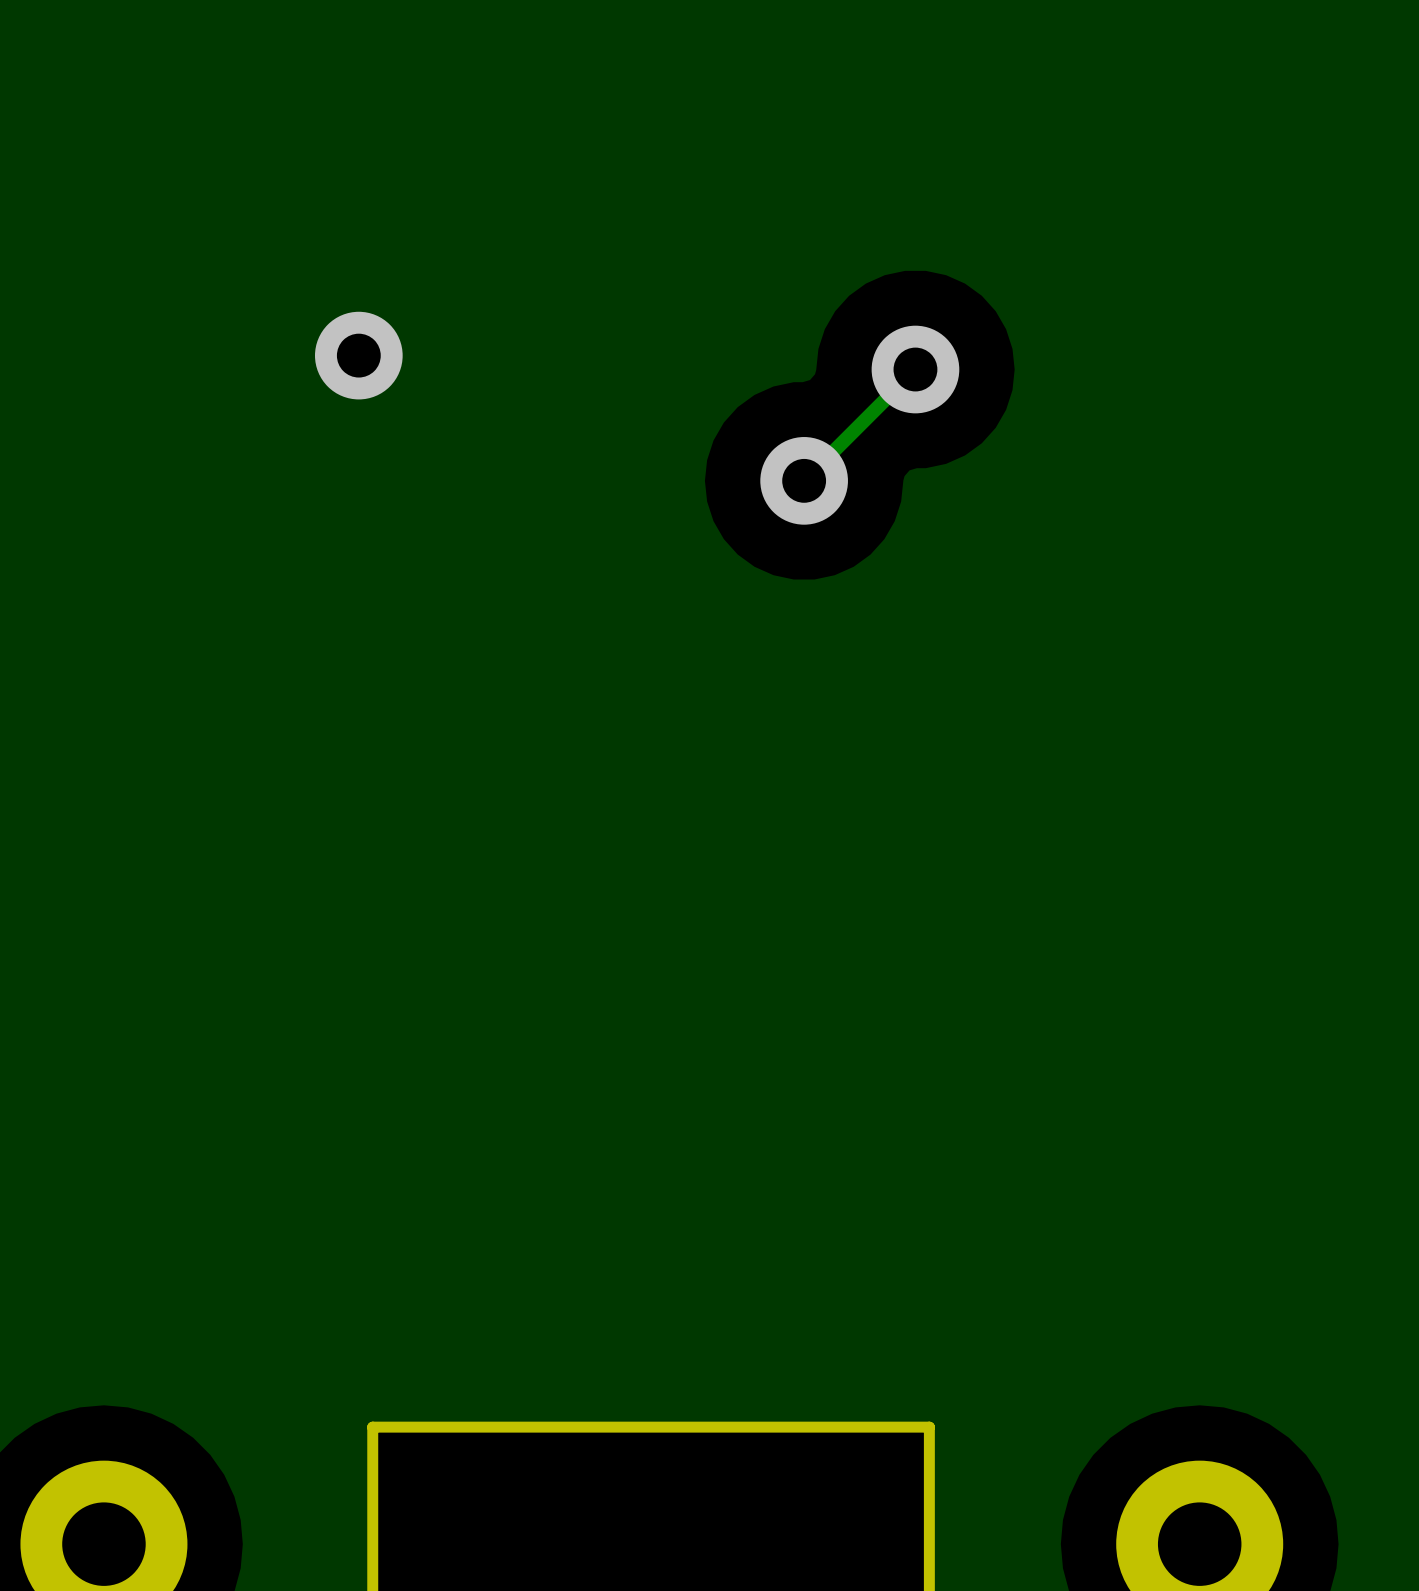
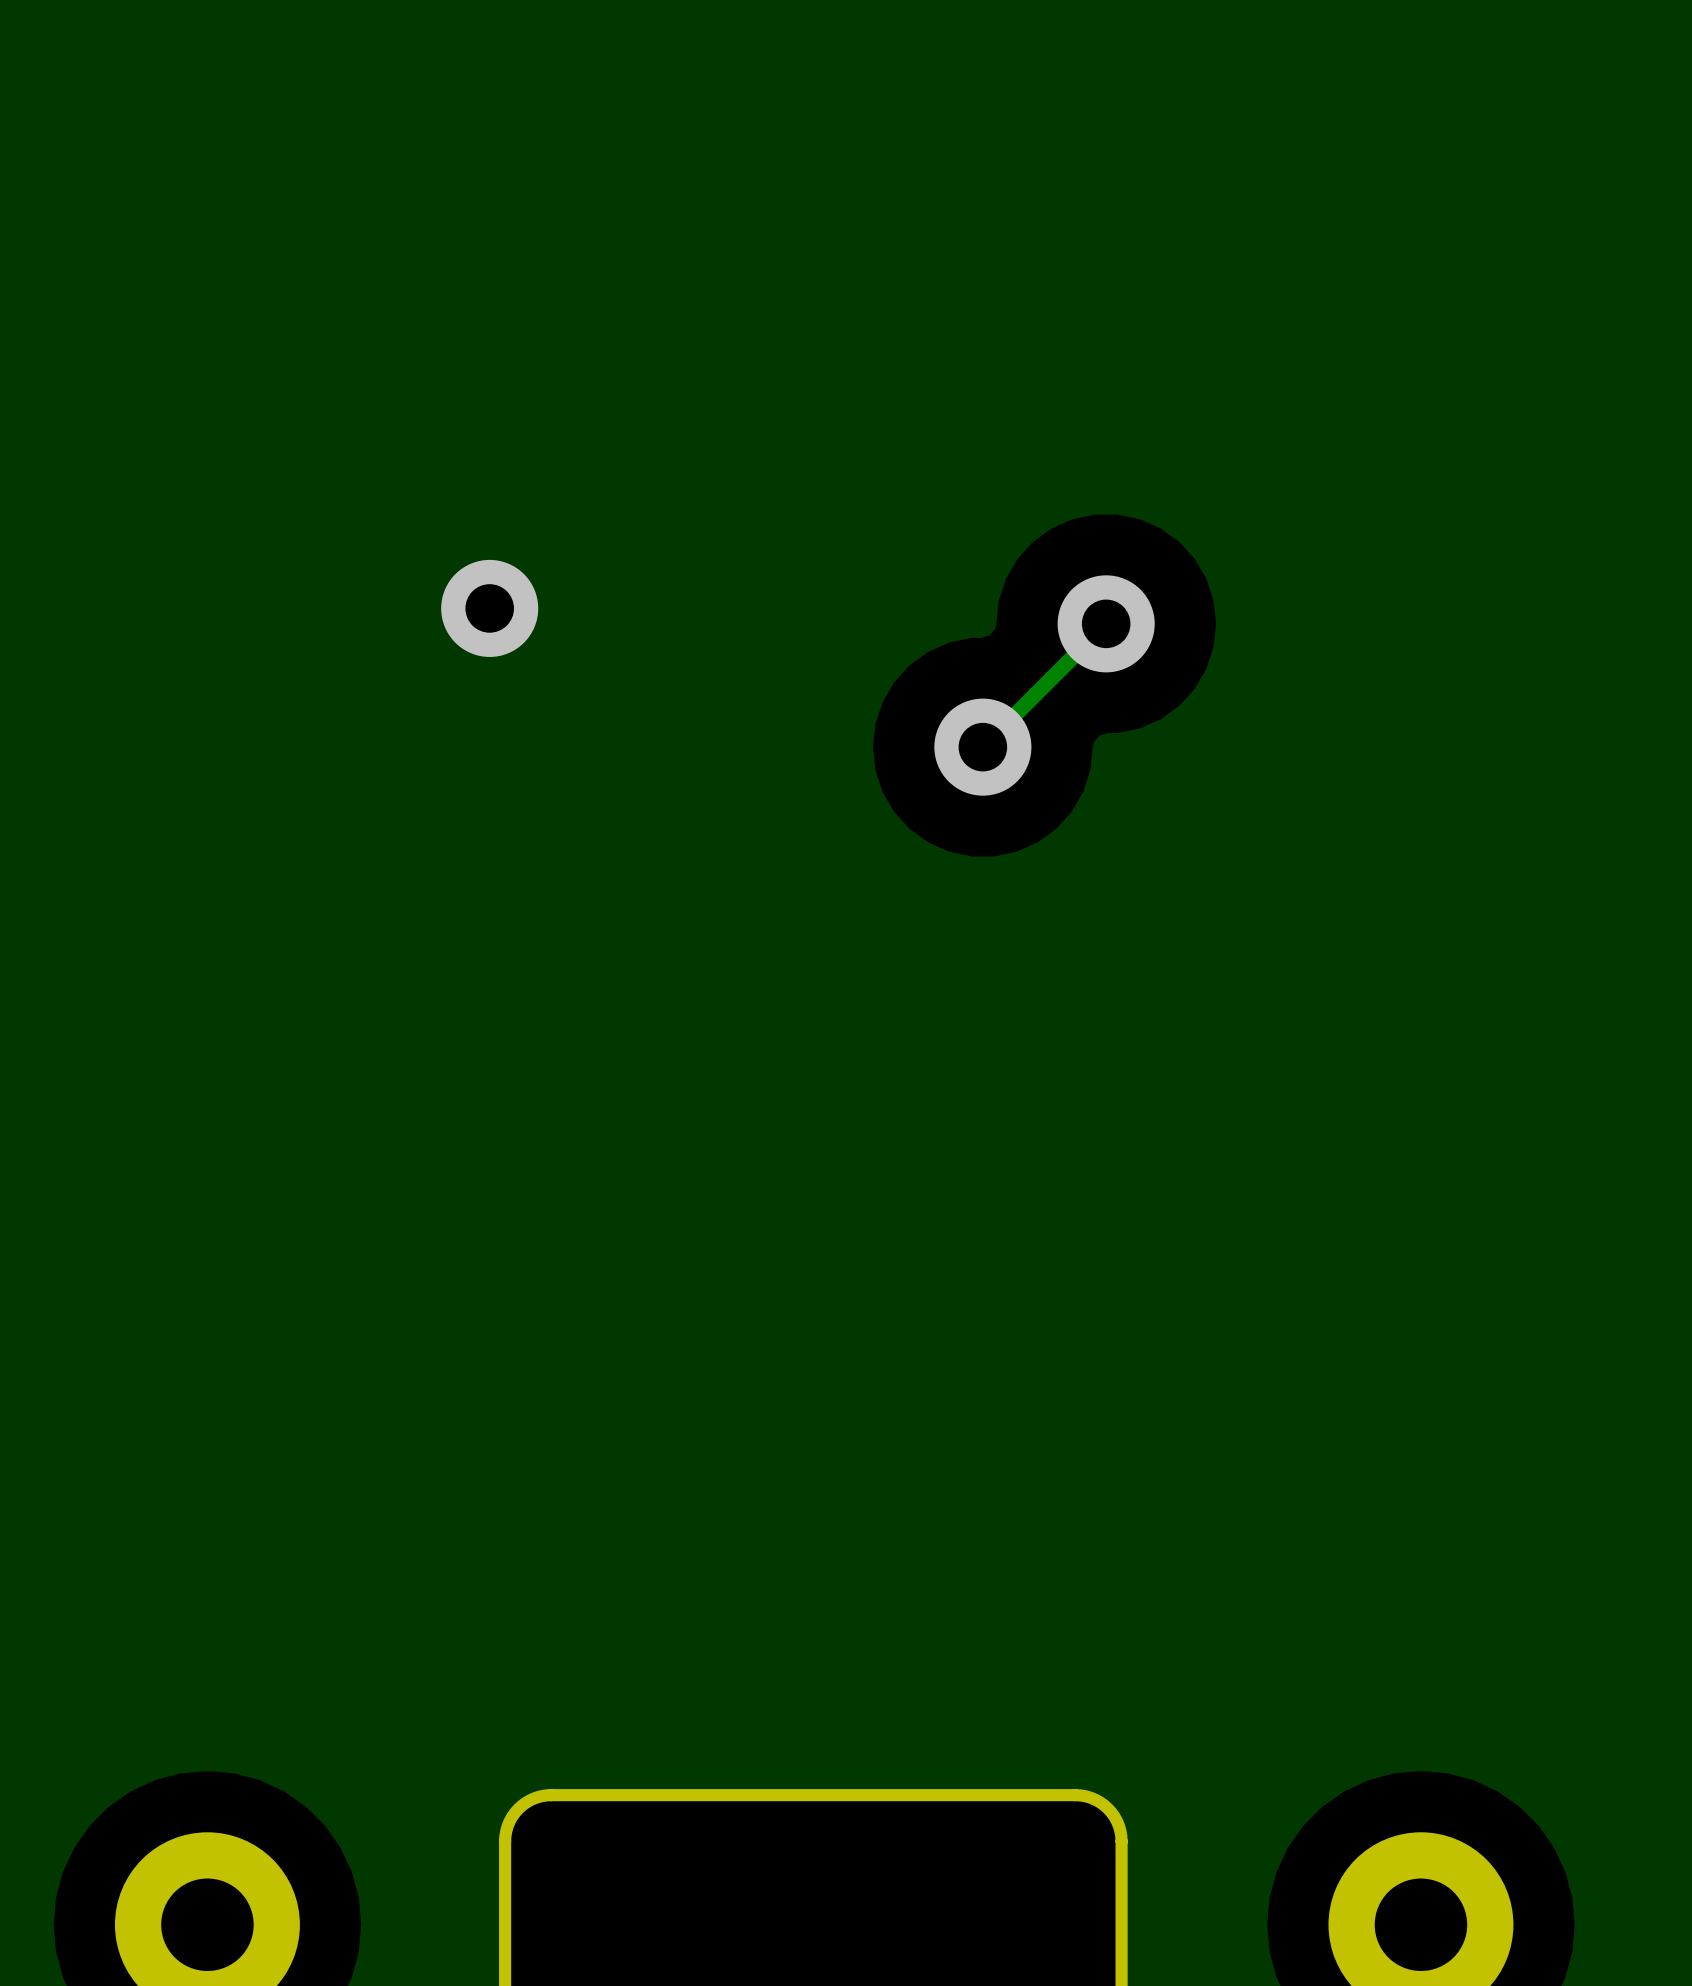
board edge: (414, 1427) (372, 1427) (372, 1468) -> (551, 1795) (531, 1799) (518, 1808) (507, 1826) (505, 1841)
board edge: (887, 1427) (929, 1427) (929, 1468) -> (1075, 1795) (1090, 1797) (1108, 1808) (1118, 1826) (1121, 1841)

